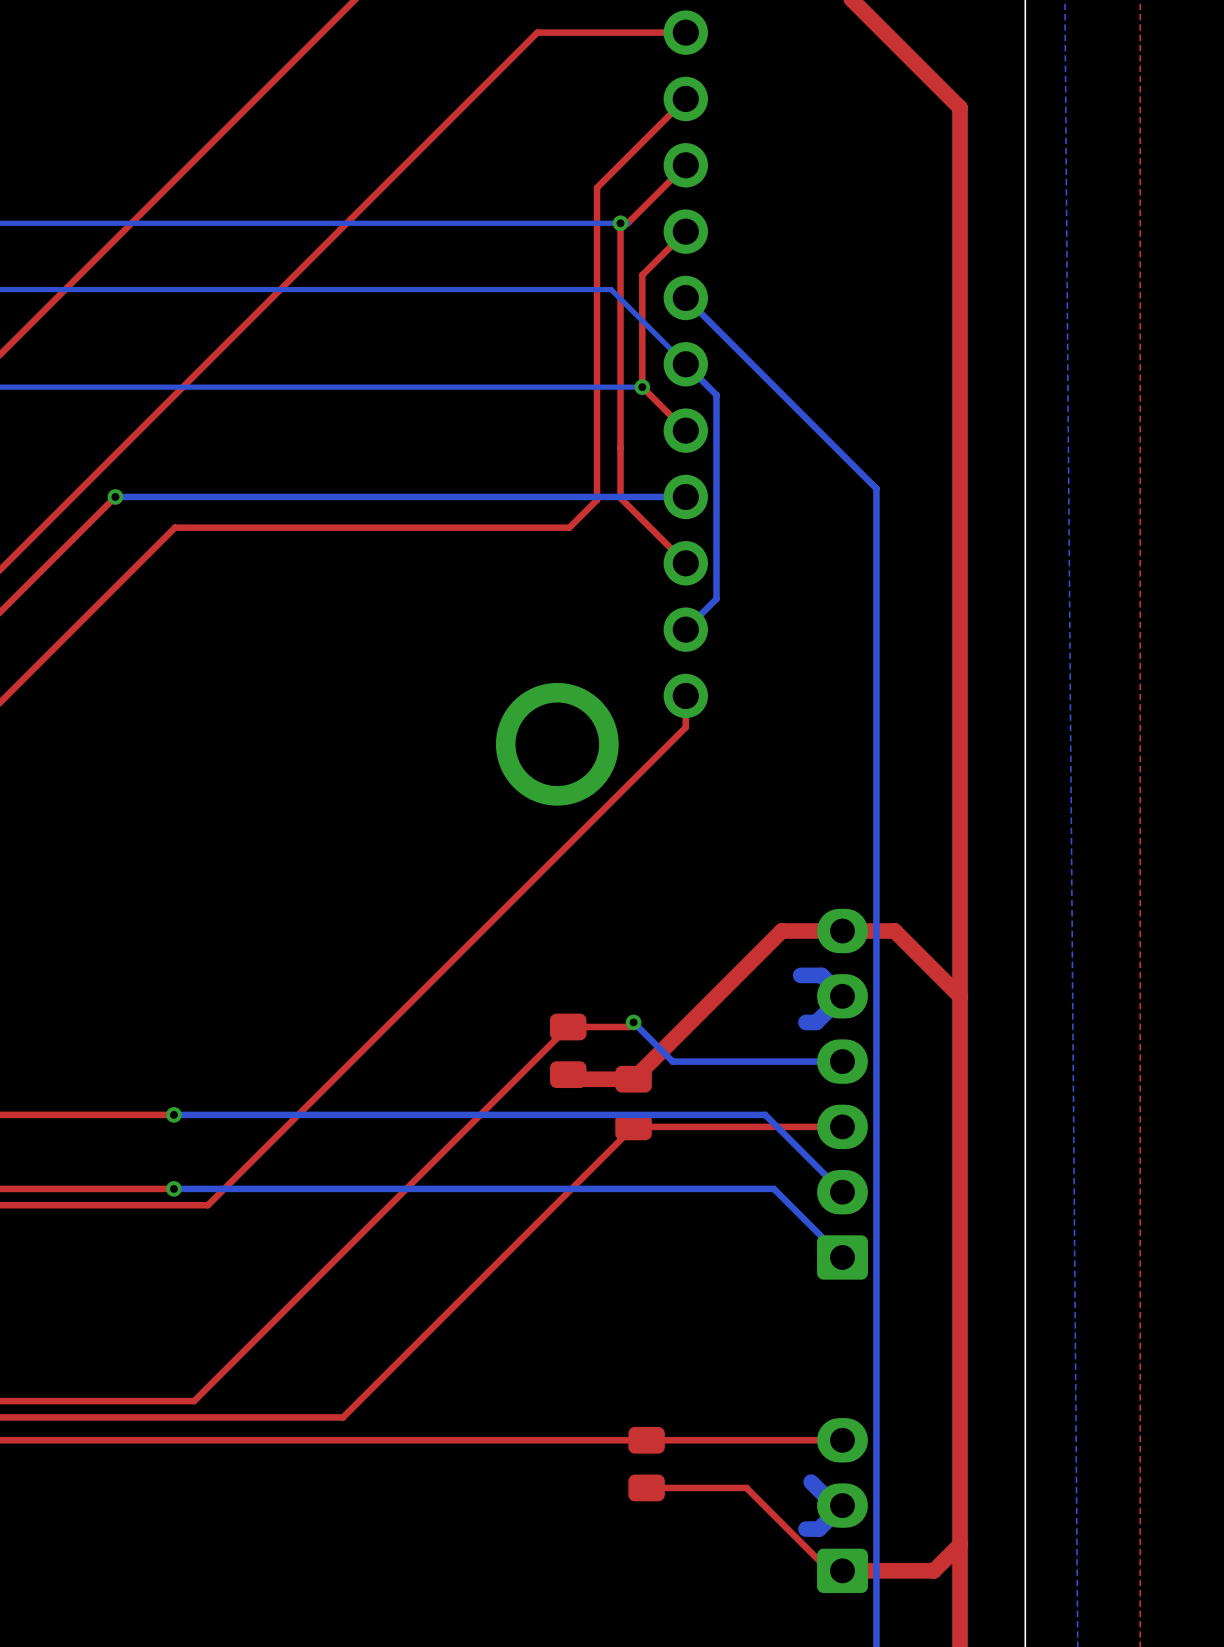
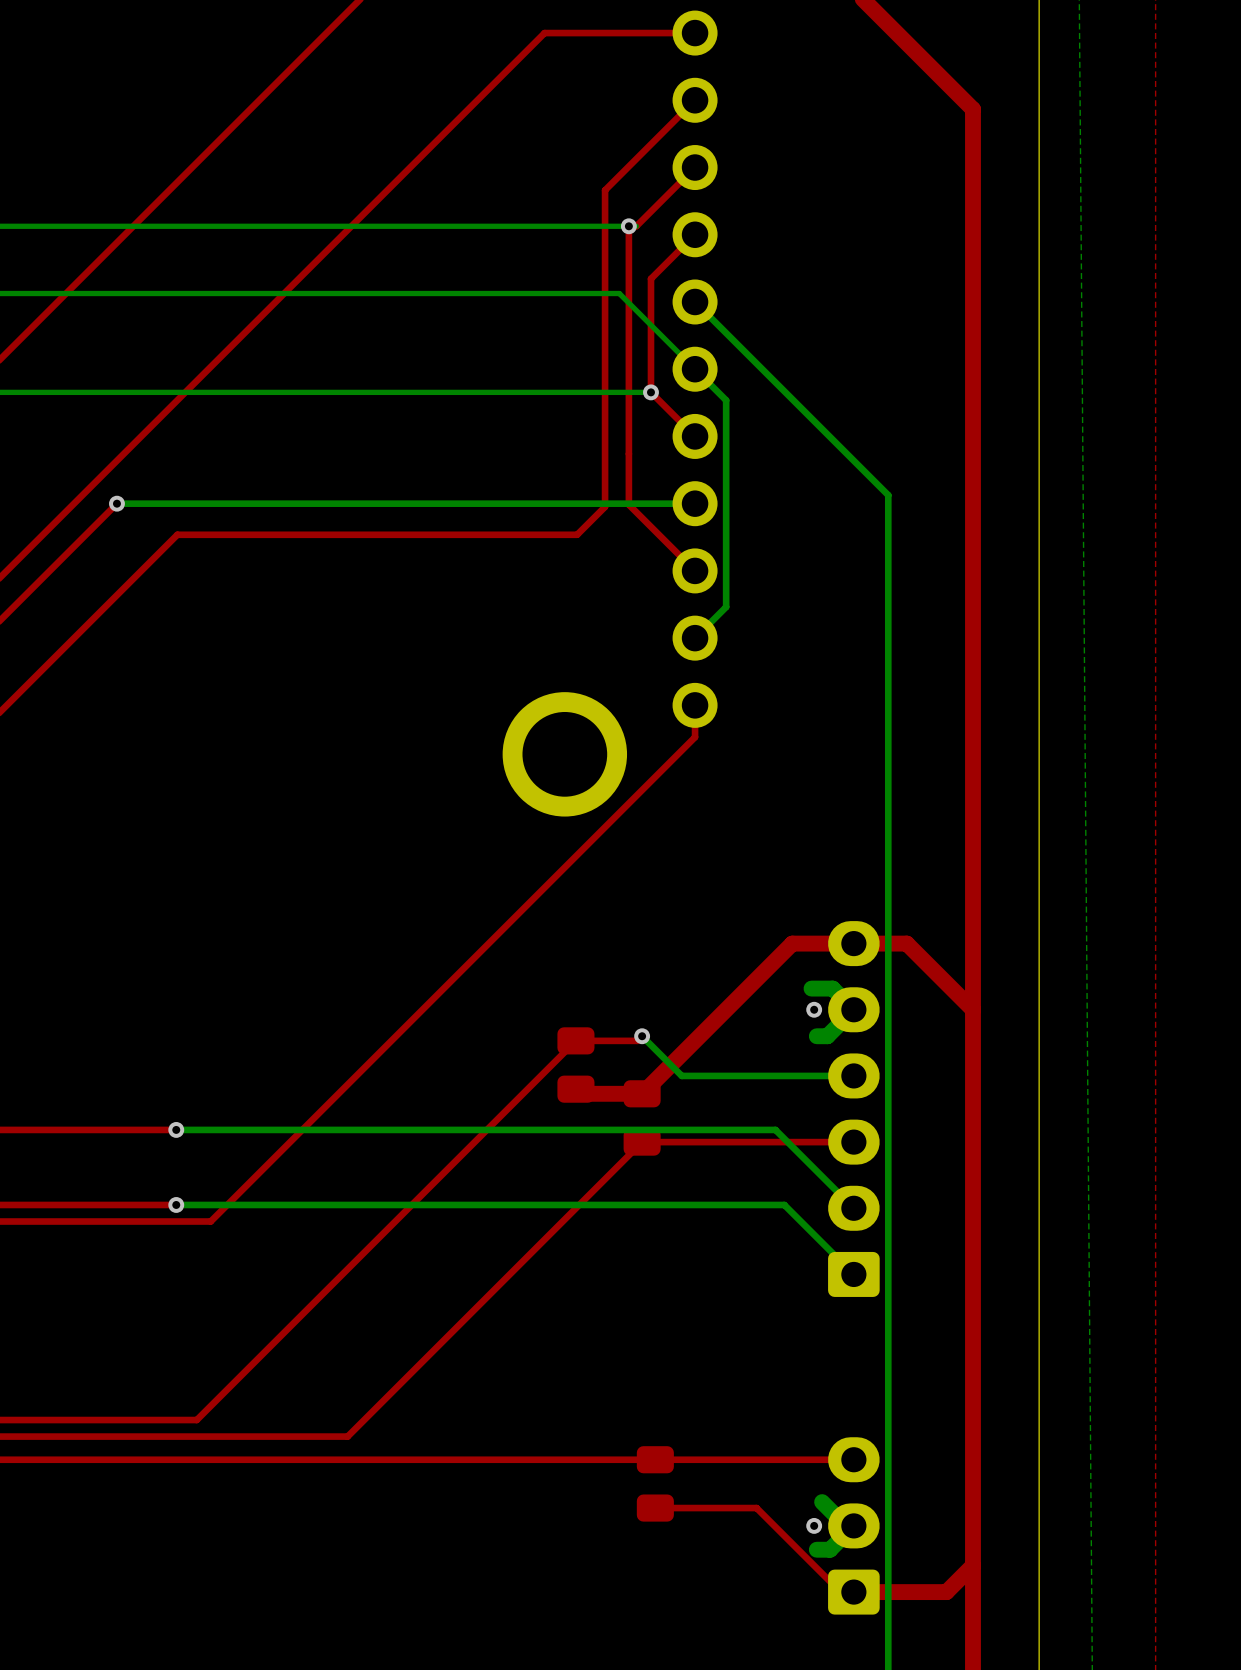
via: none -> (814, 1009)
via: none -> (814, 1525)

